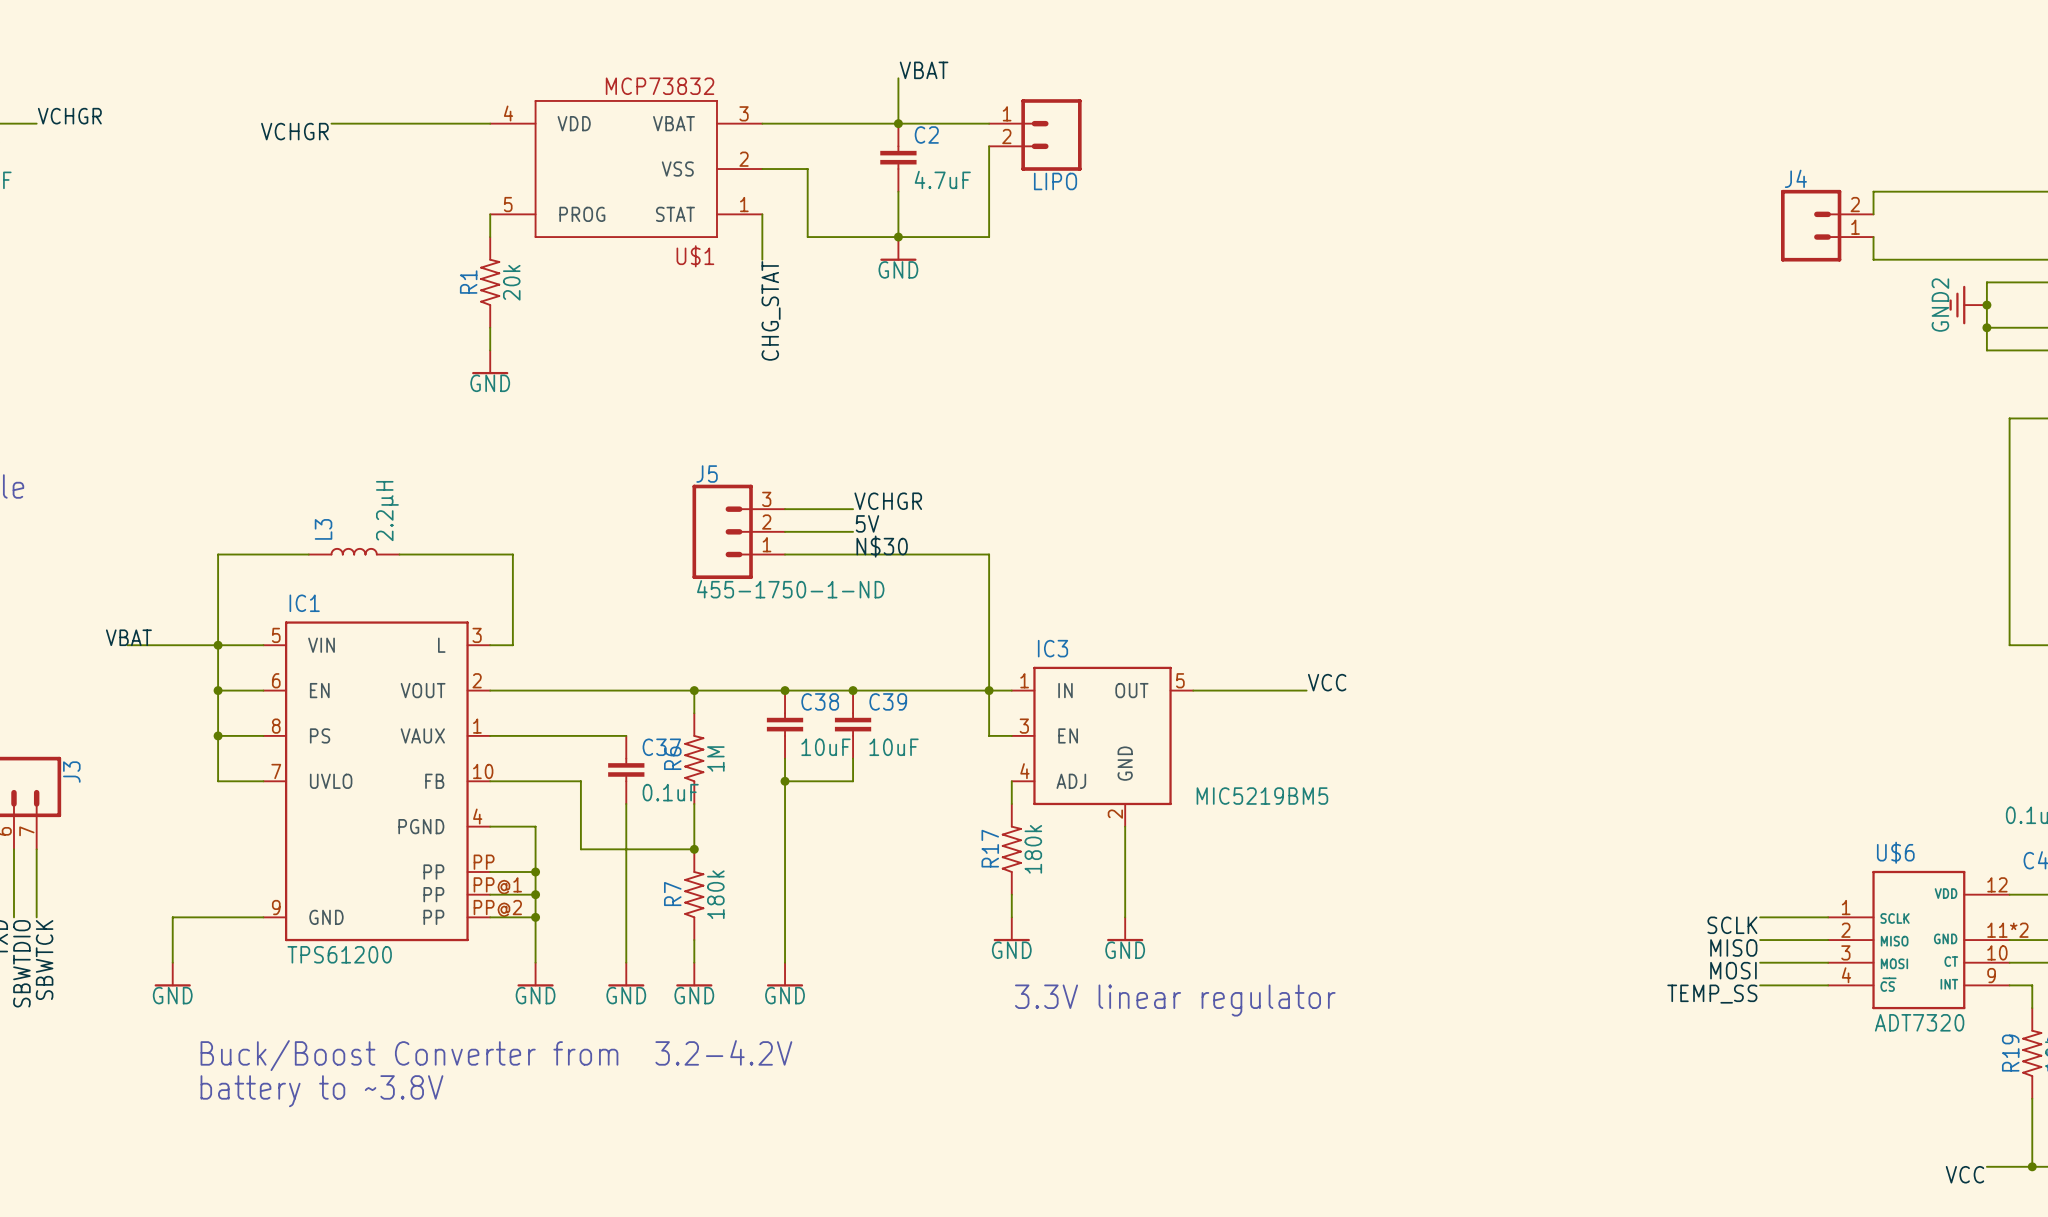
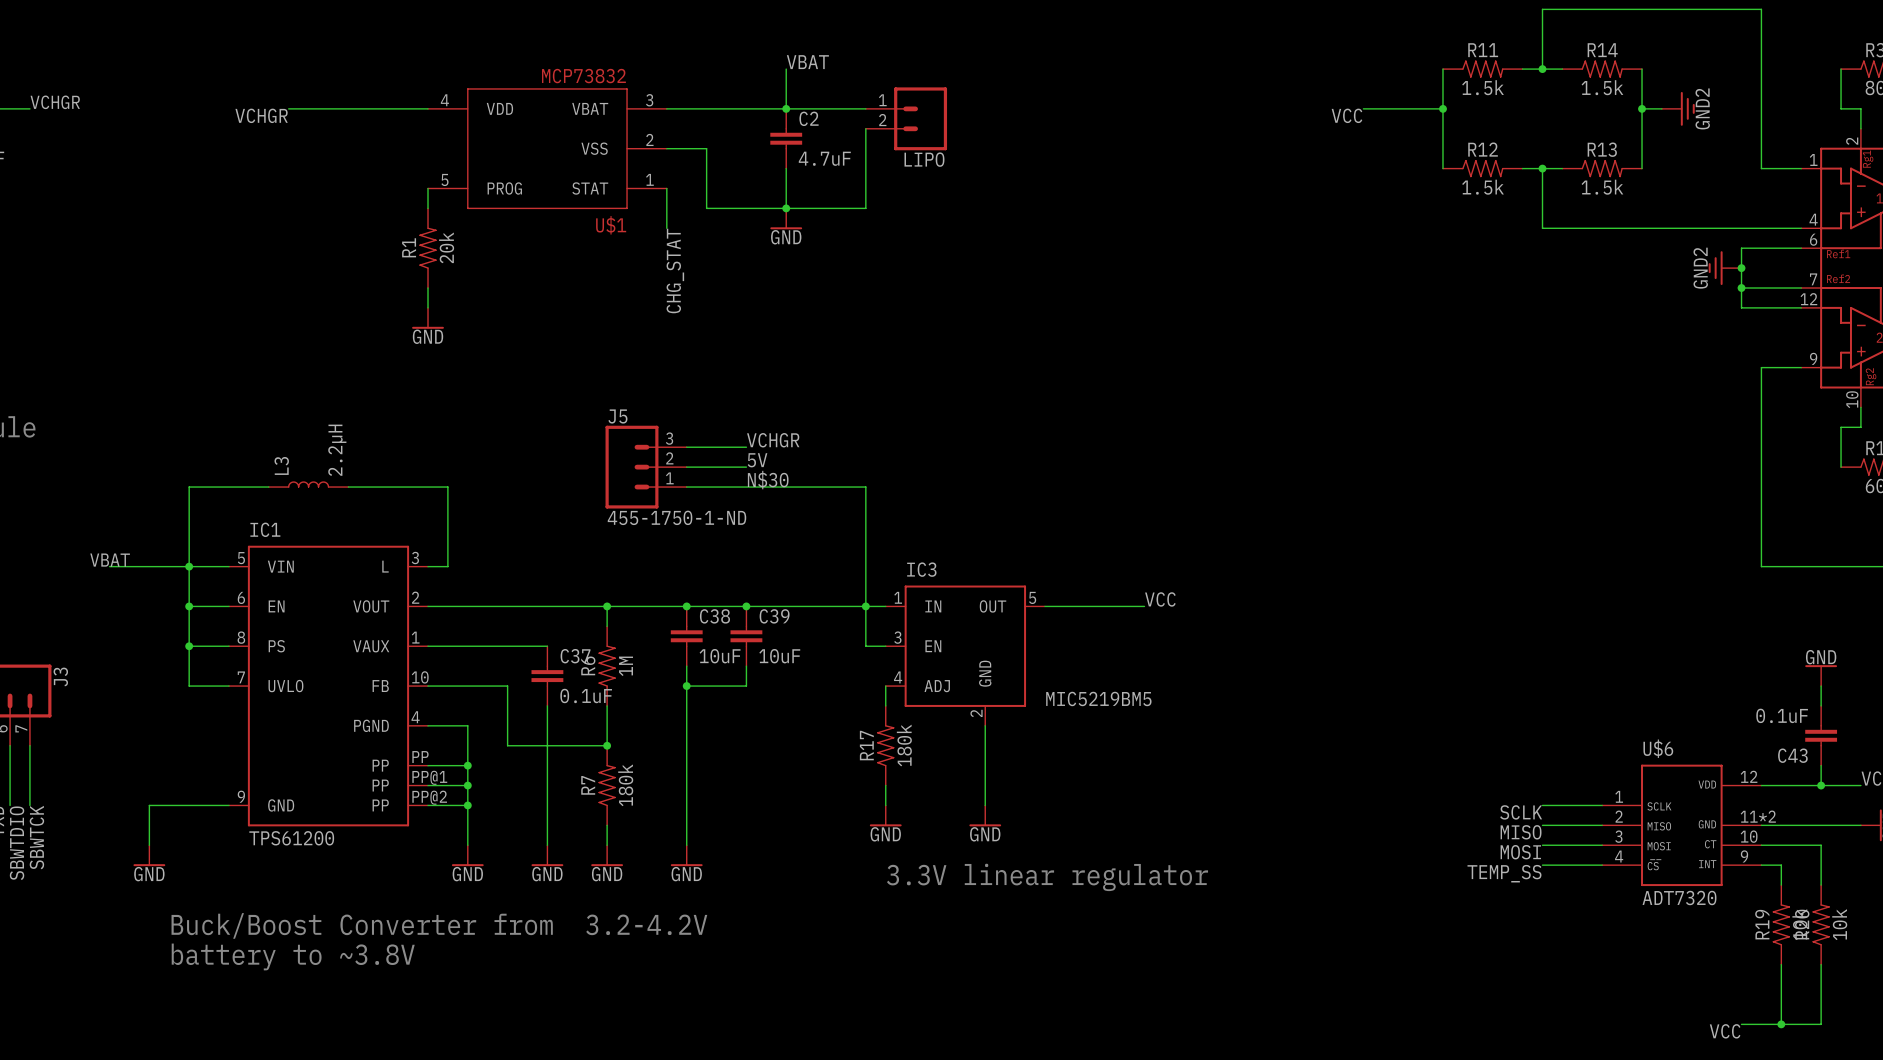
wire: none -> (1442, 69) (1442, 168)
R11: none -> 1.5k (1482, 69)
wire: none -> (1522, 69) (1562, 69)
junction: none -> (1542, 69)
R14: none -> 1.5k (1602, 69)
wire: none -> (1642, 69) (1642, 168)
wire: none -> (1363, 108) (1442, 108)
junction: none -> (1442, 108)
wire: none -> (1642, 108) (1661, 108)
junction: none -> (1642, 108)
power symbol: none -> GND2 (1678, 108)
label: none -> VCC (1346, 115)
R12: none -> 1.5k (1482, 168)
wire: none -> (1522, 168) (1562, 168)
junction: none -> (1542, 168)
R13: none -> 1.5k (1602, 168)
wire: (2009, 191) (1873, 191) (1873, 214) -> (1761, 168) (1761, 9) (1542, 9) (1542, 69)
J4: (1827, 225) -> none
wire: (1873, 237) (1873, 259) -> (1542, 168) (1542, 228) (1642, 228)

